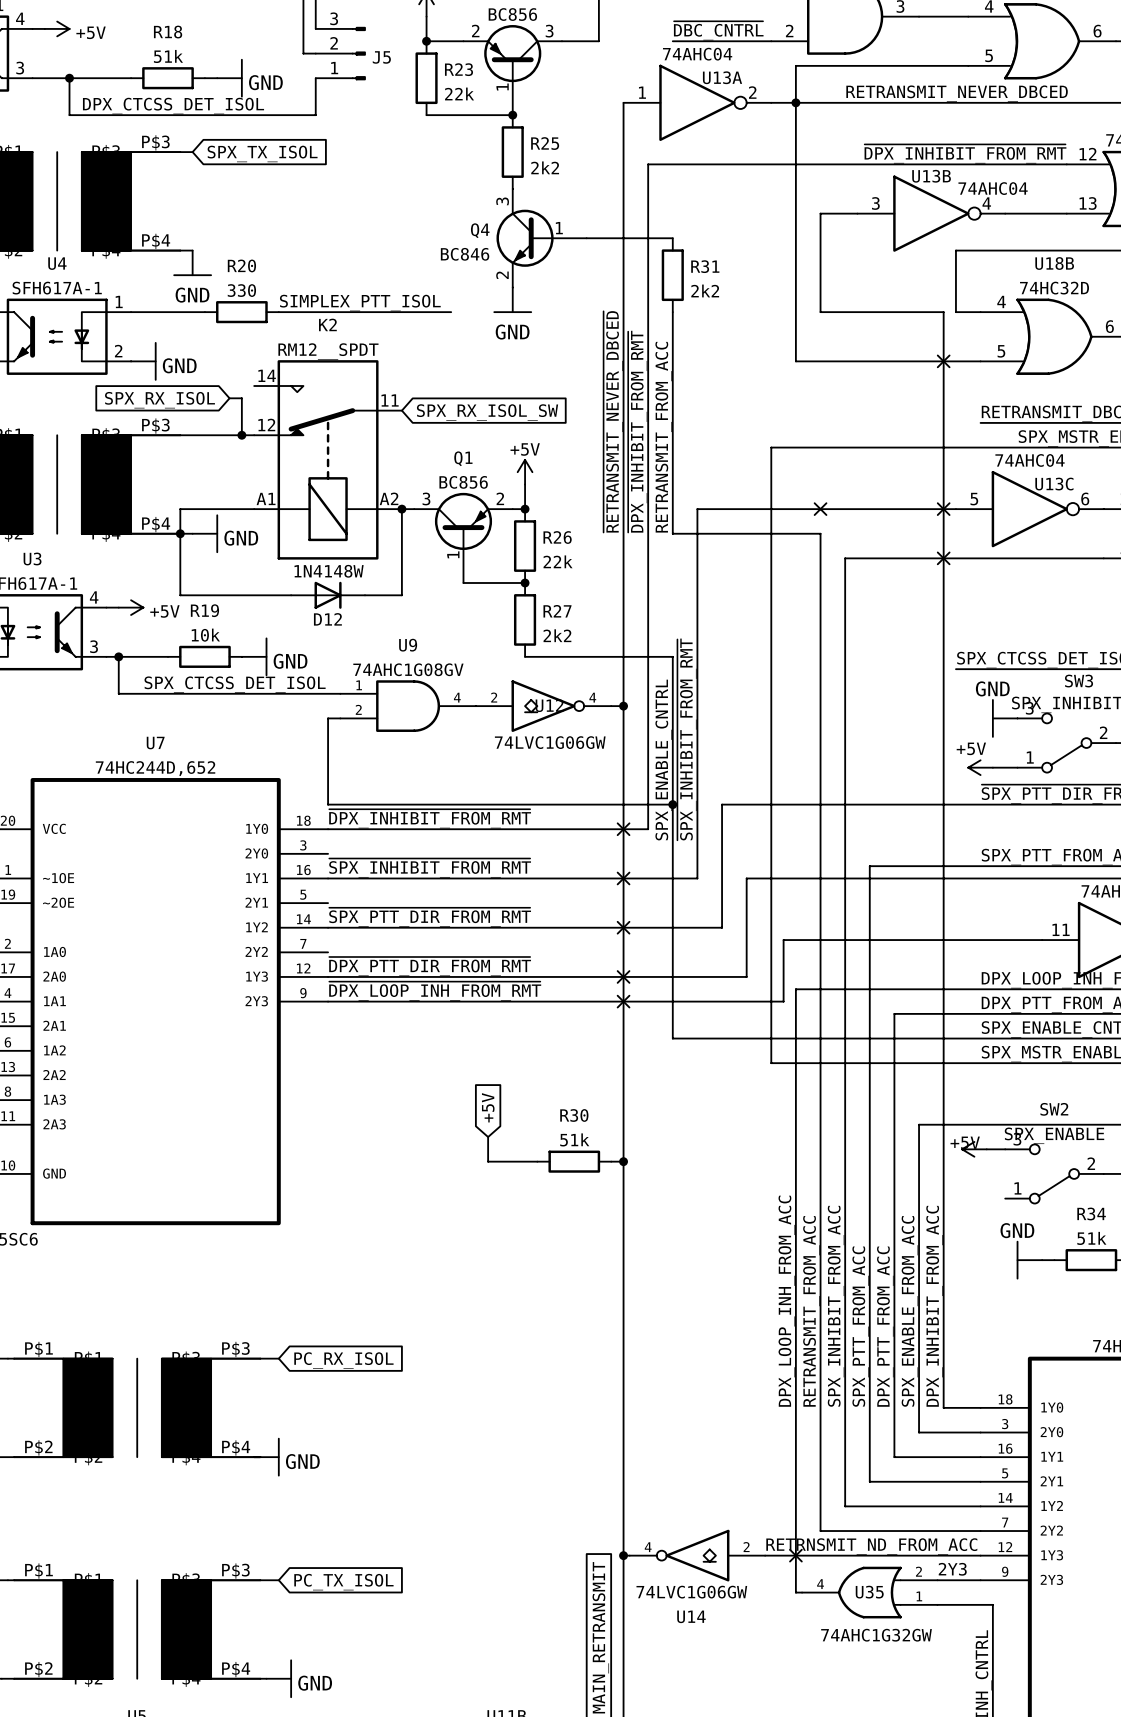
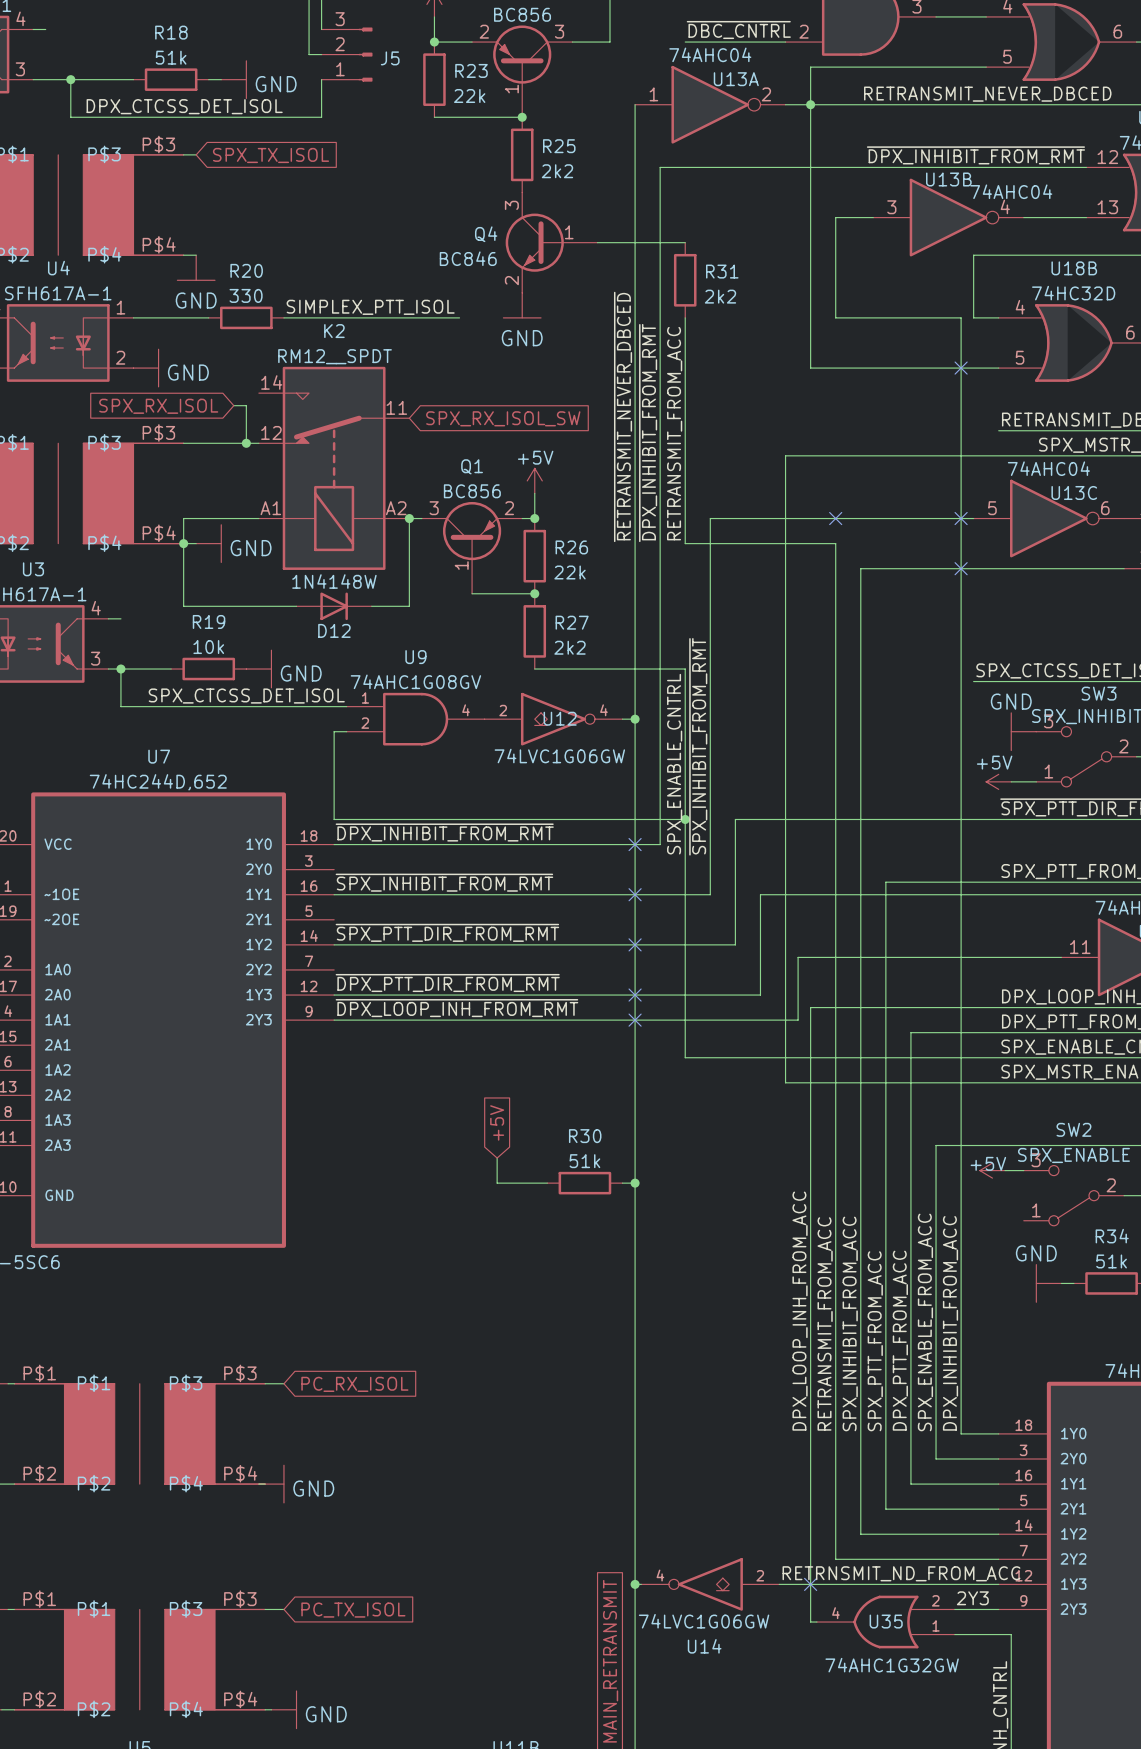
power symbol: +5V (57, 28) -> none
power symbol: +5V (131, 607) -> none

